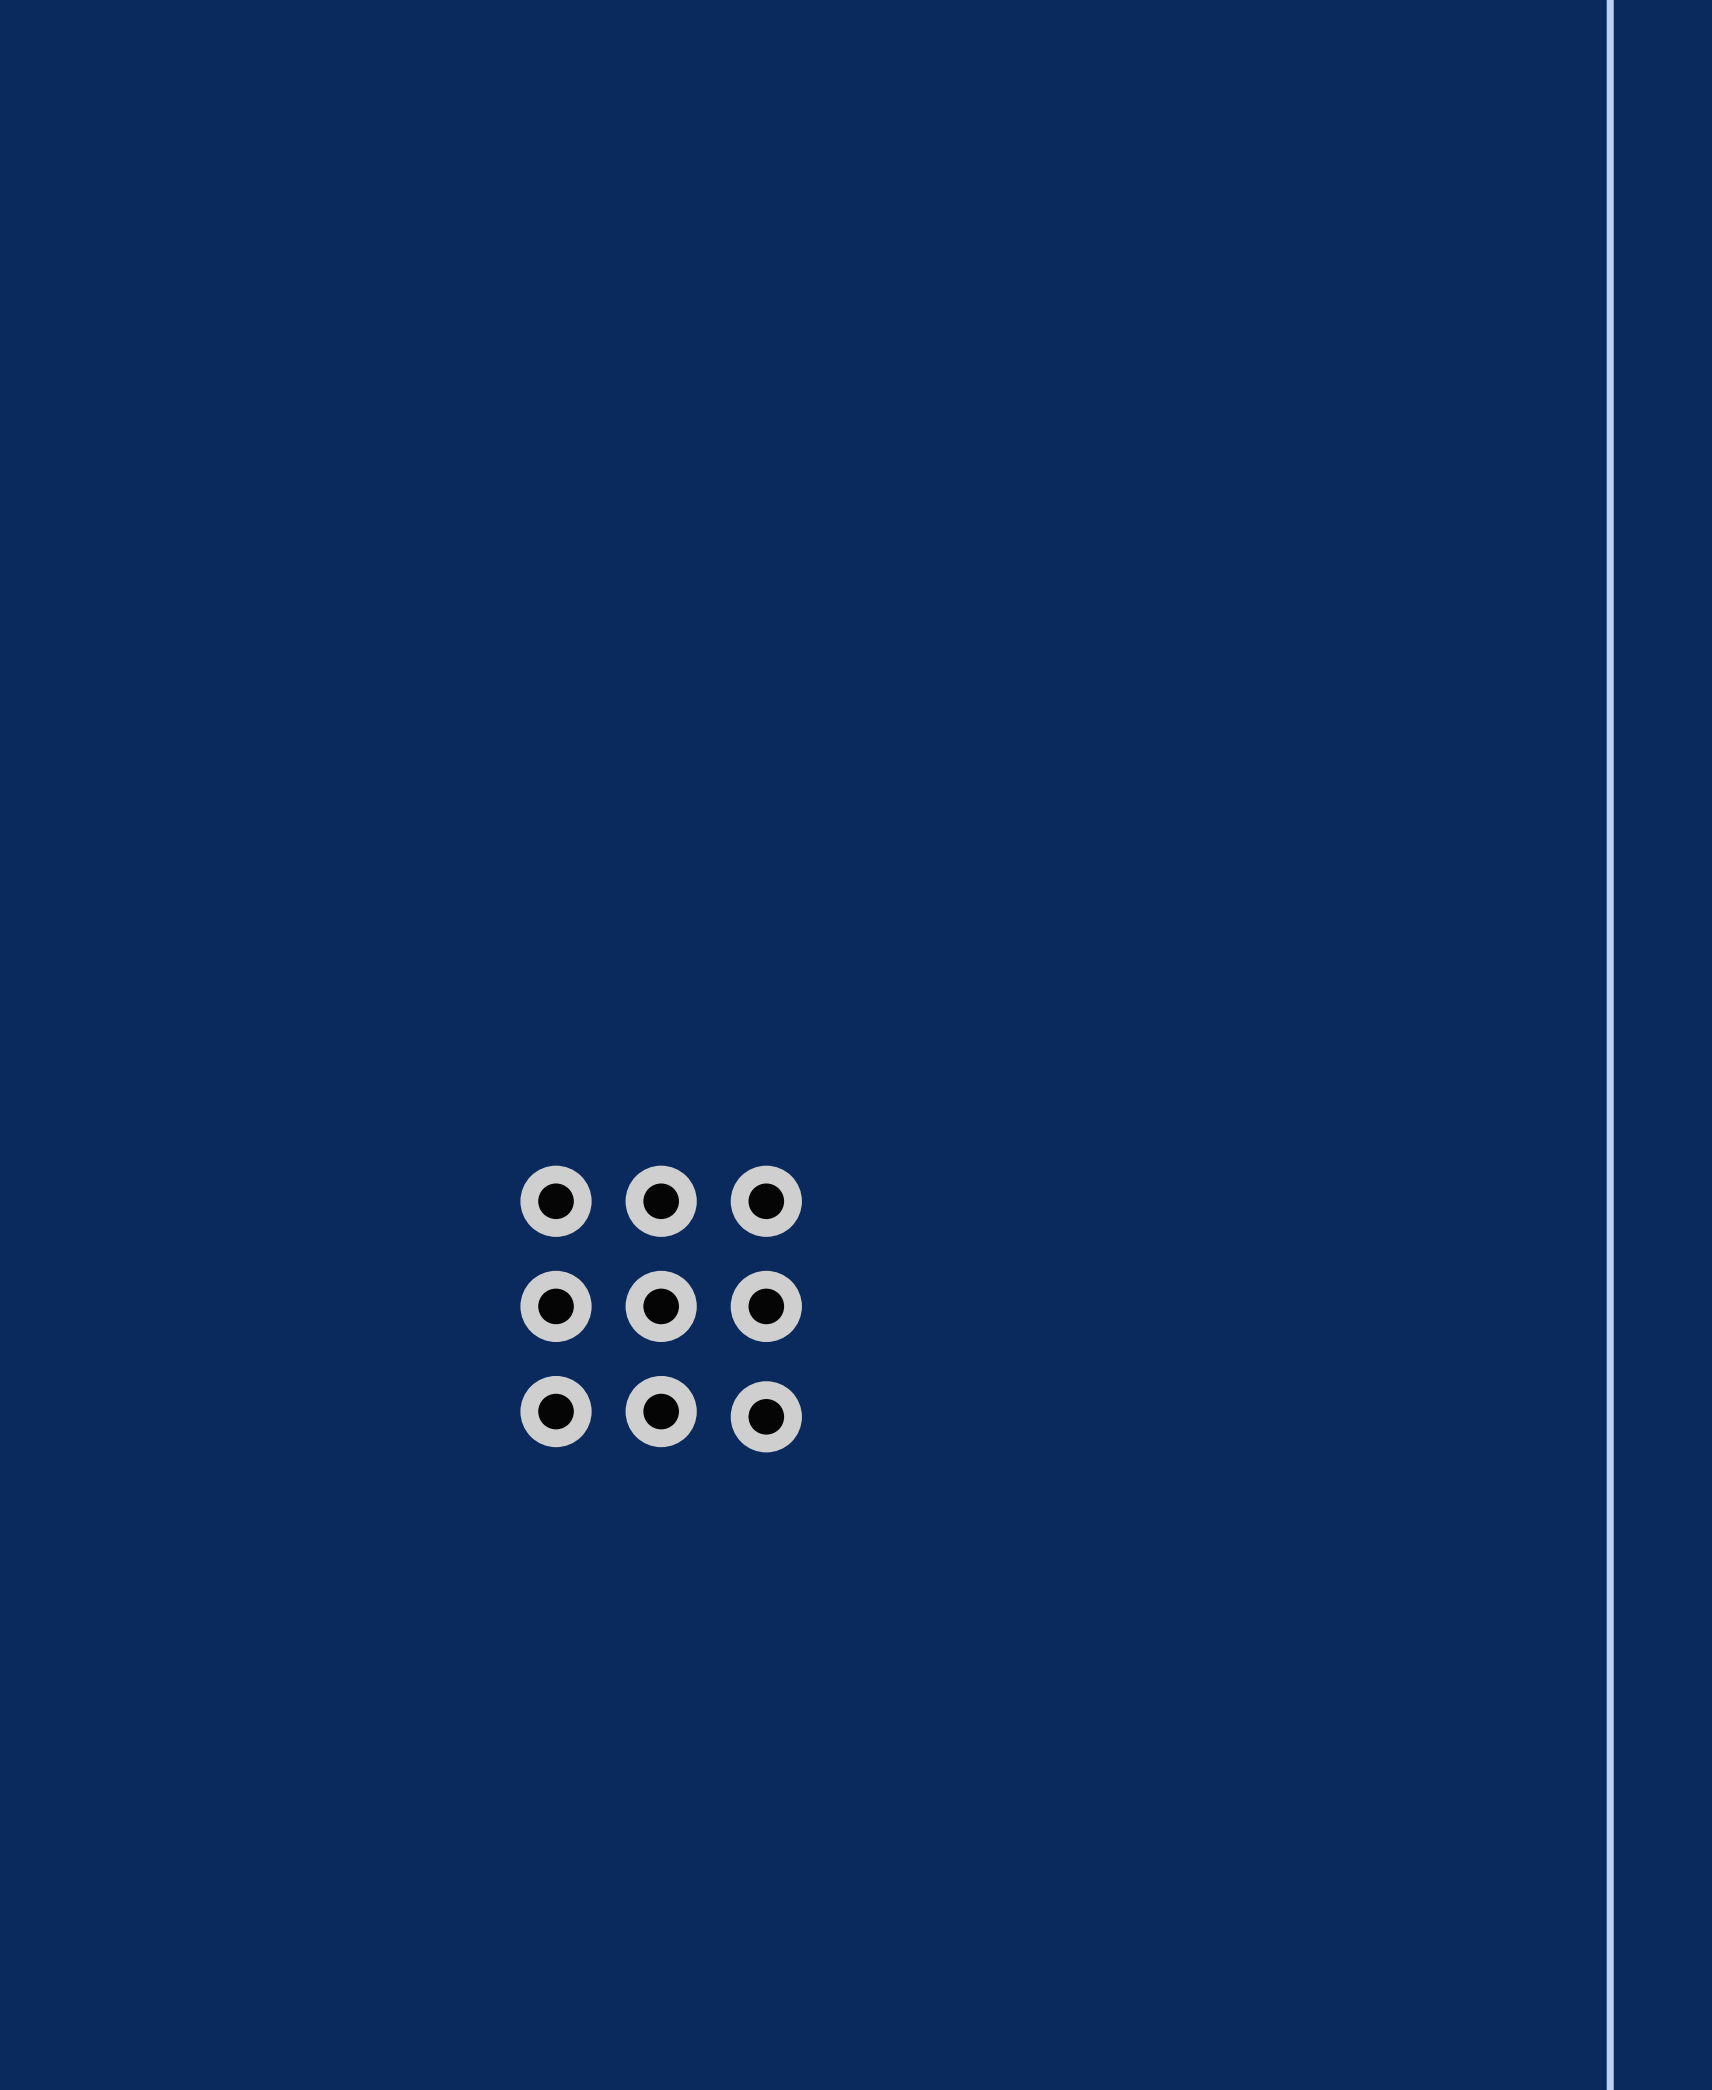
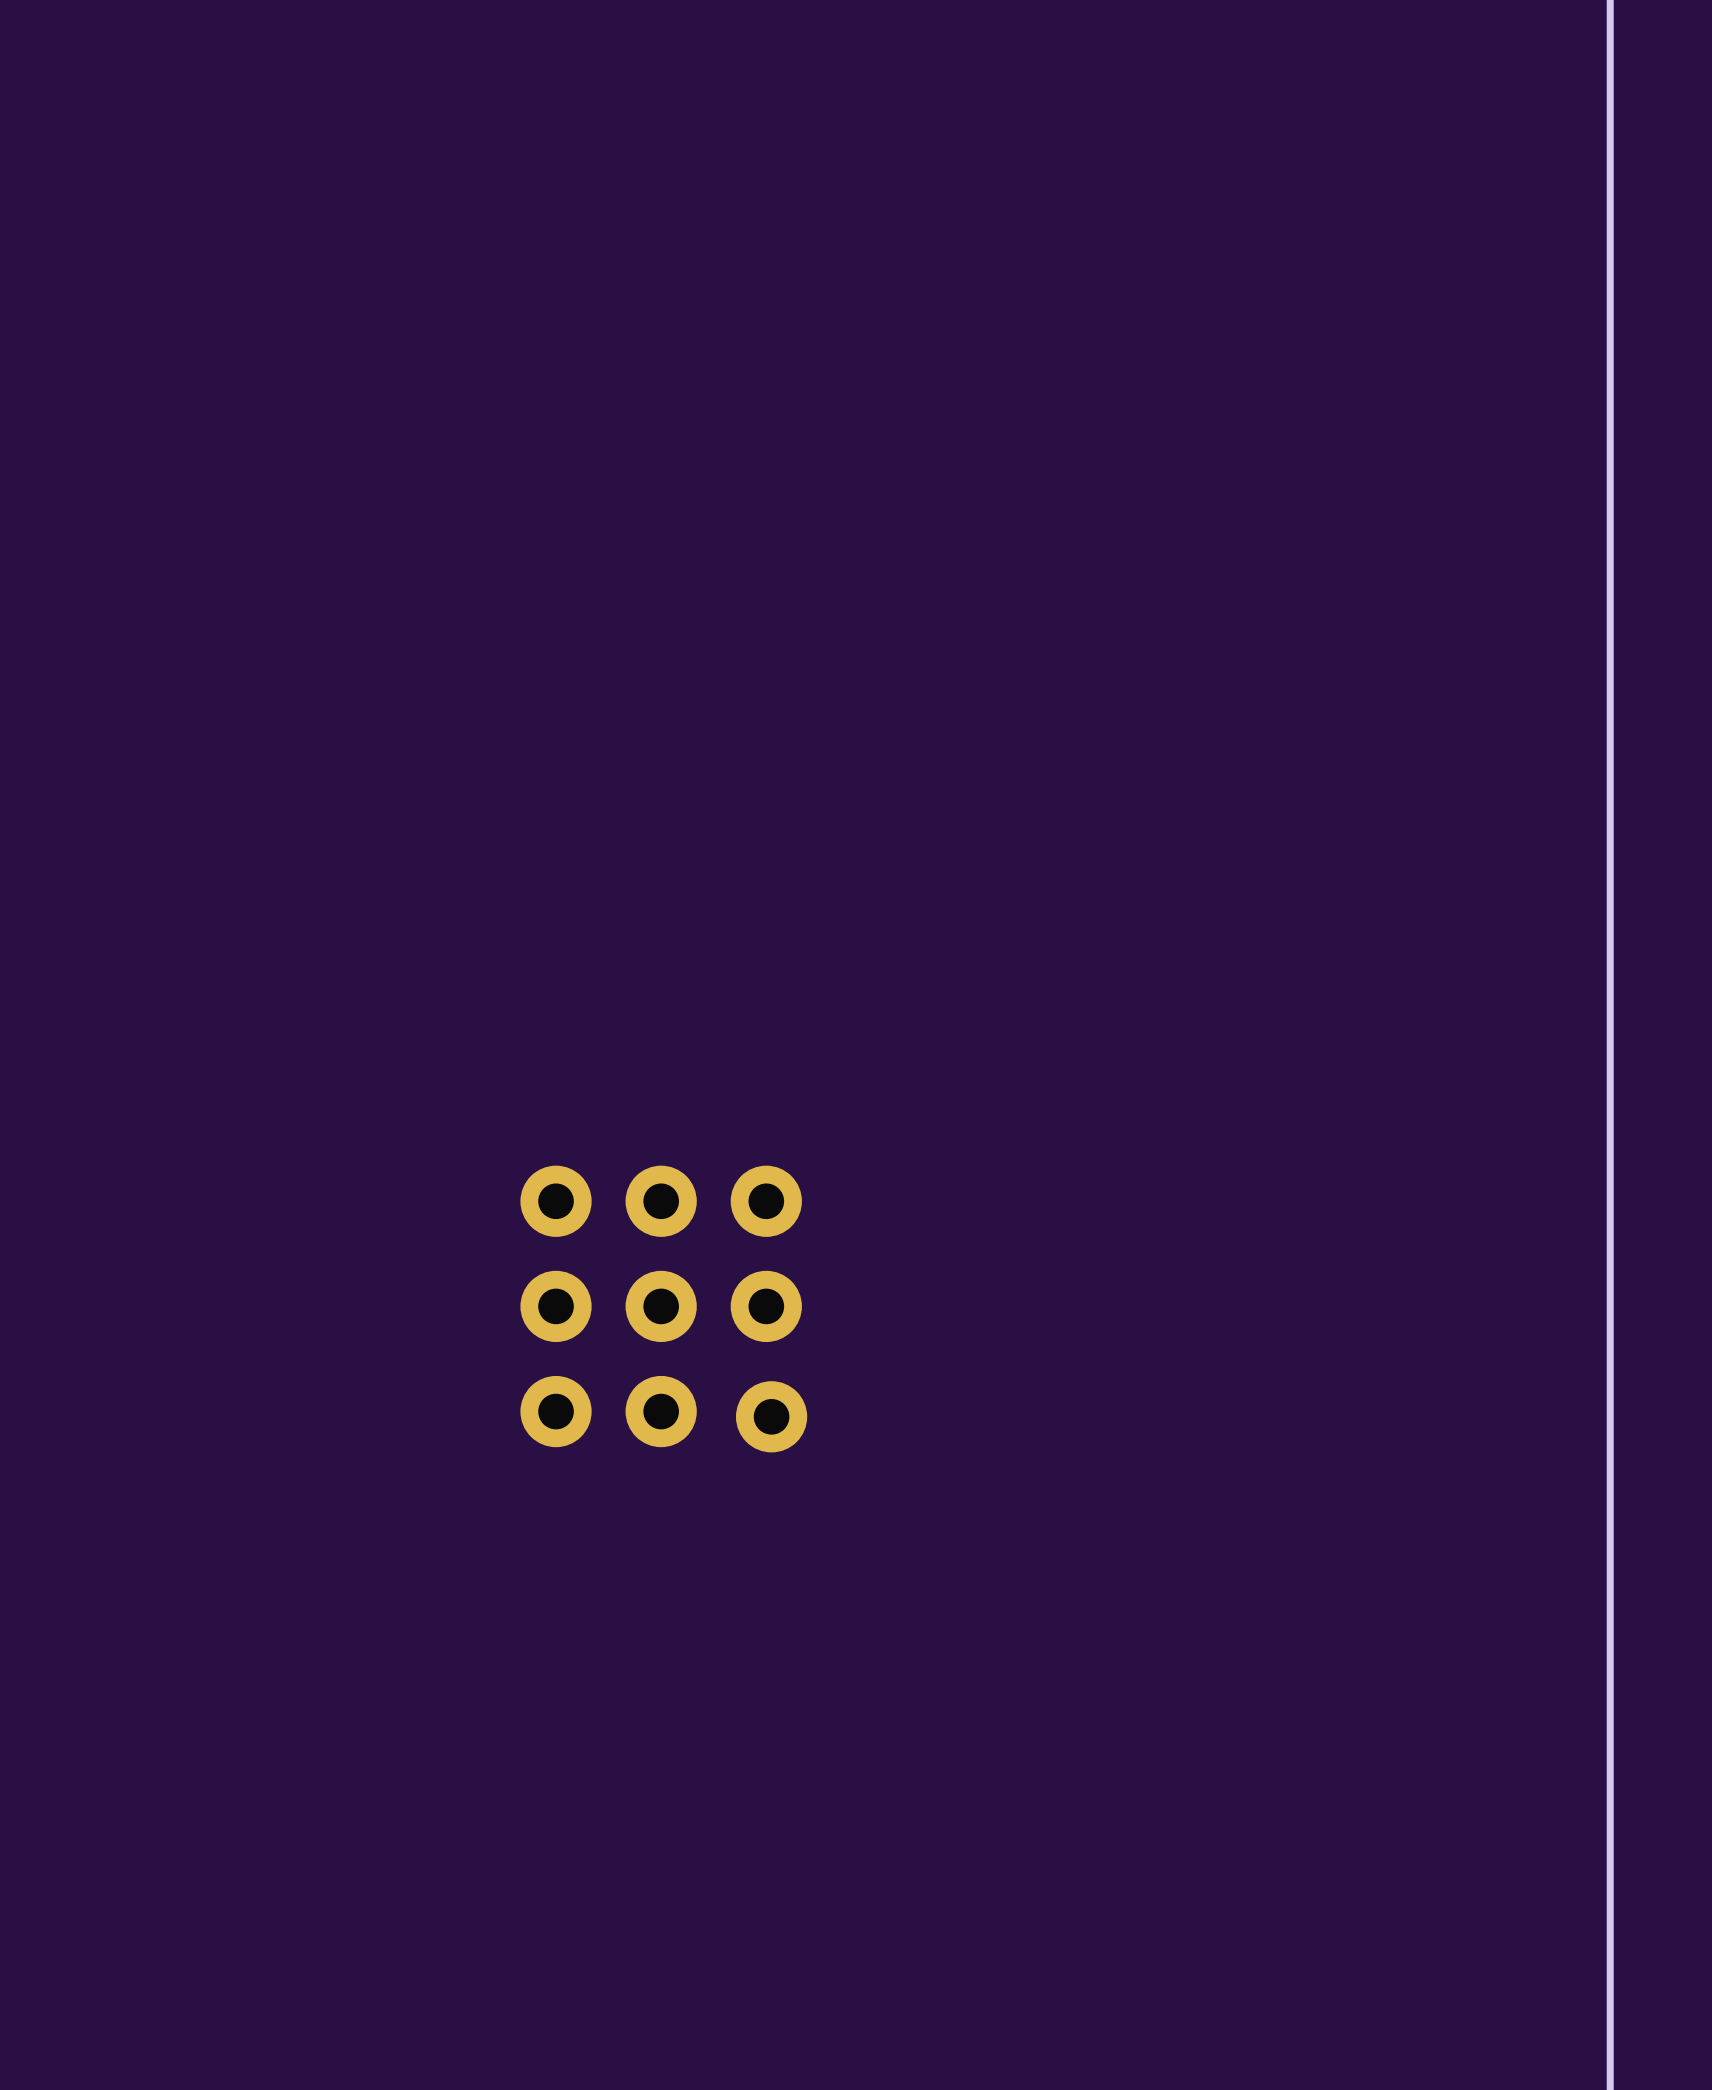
part footprint: [520, 1165, 802, 1453] -> [520, 1165, 808, 1453]

